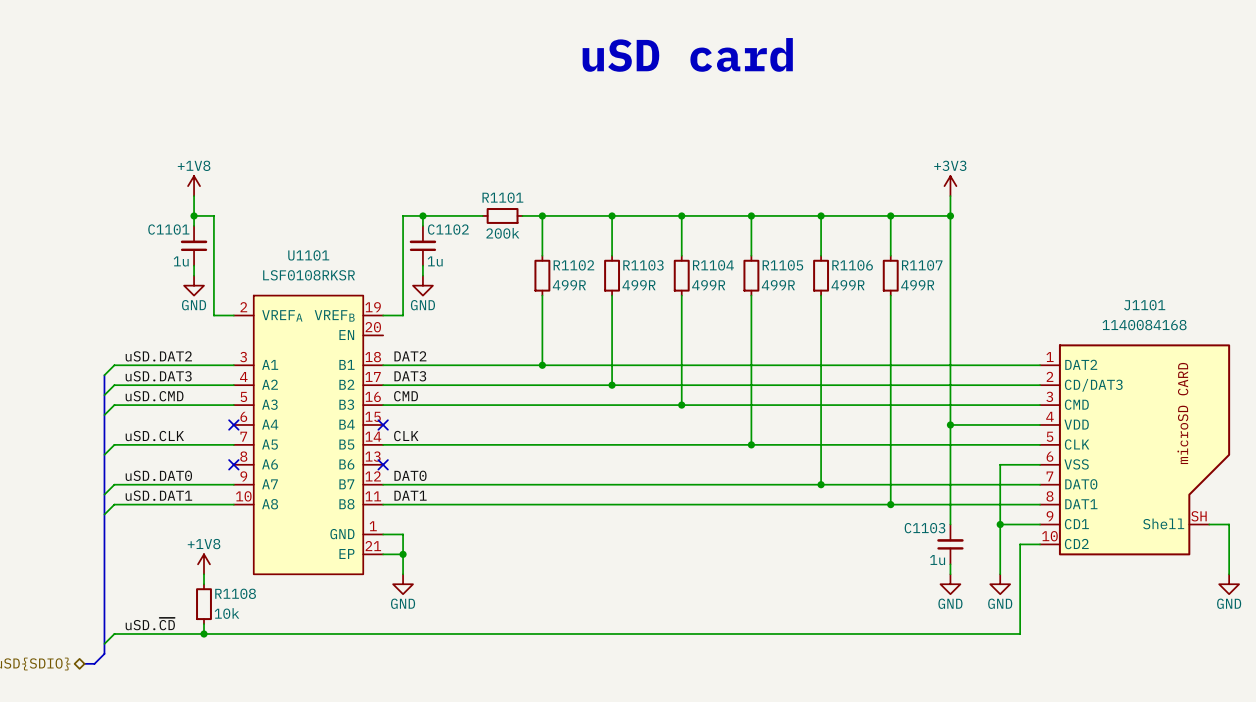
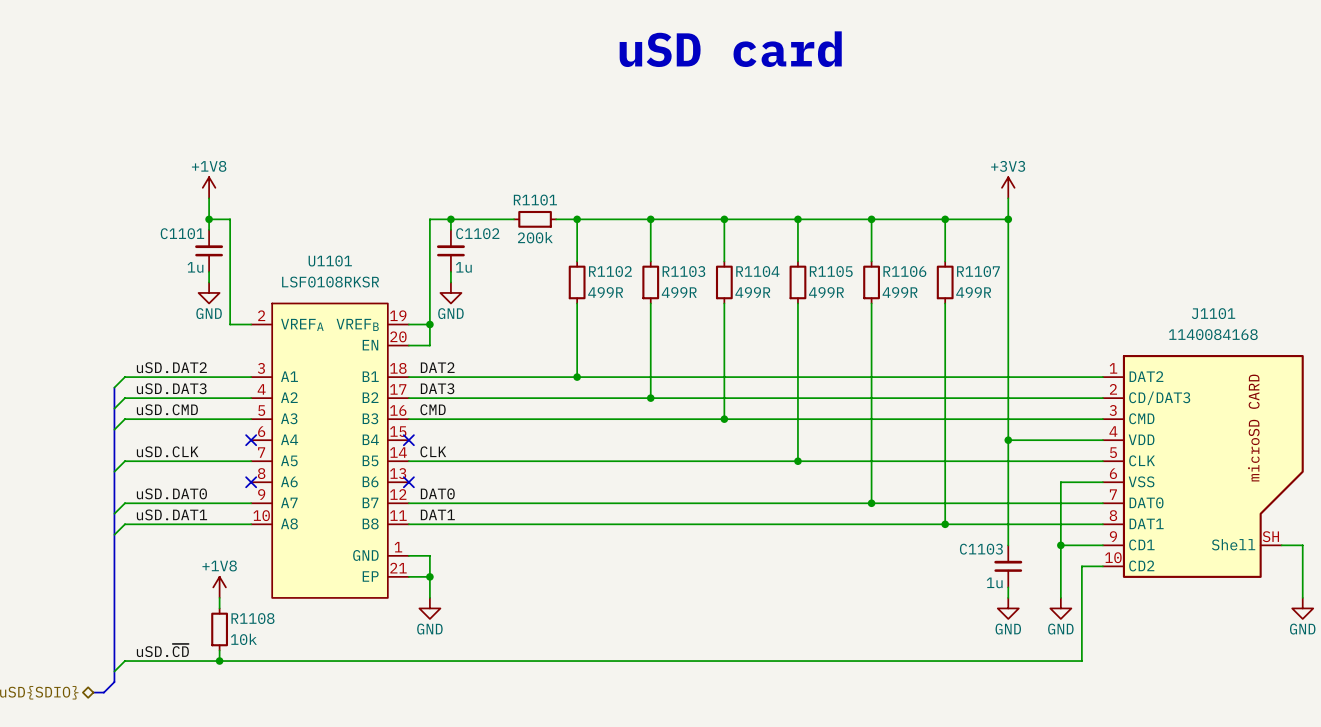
wire: none -> (429, 324) (429, 345) (408, 345)
junction: none -> (429, 324)

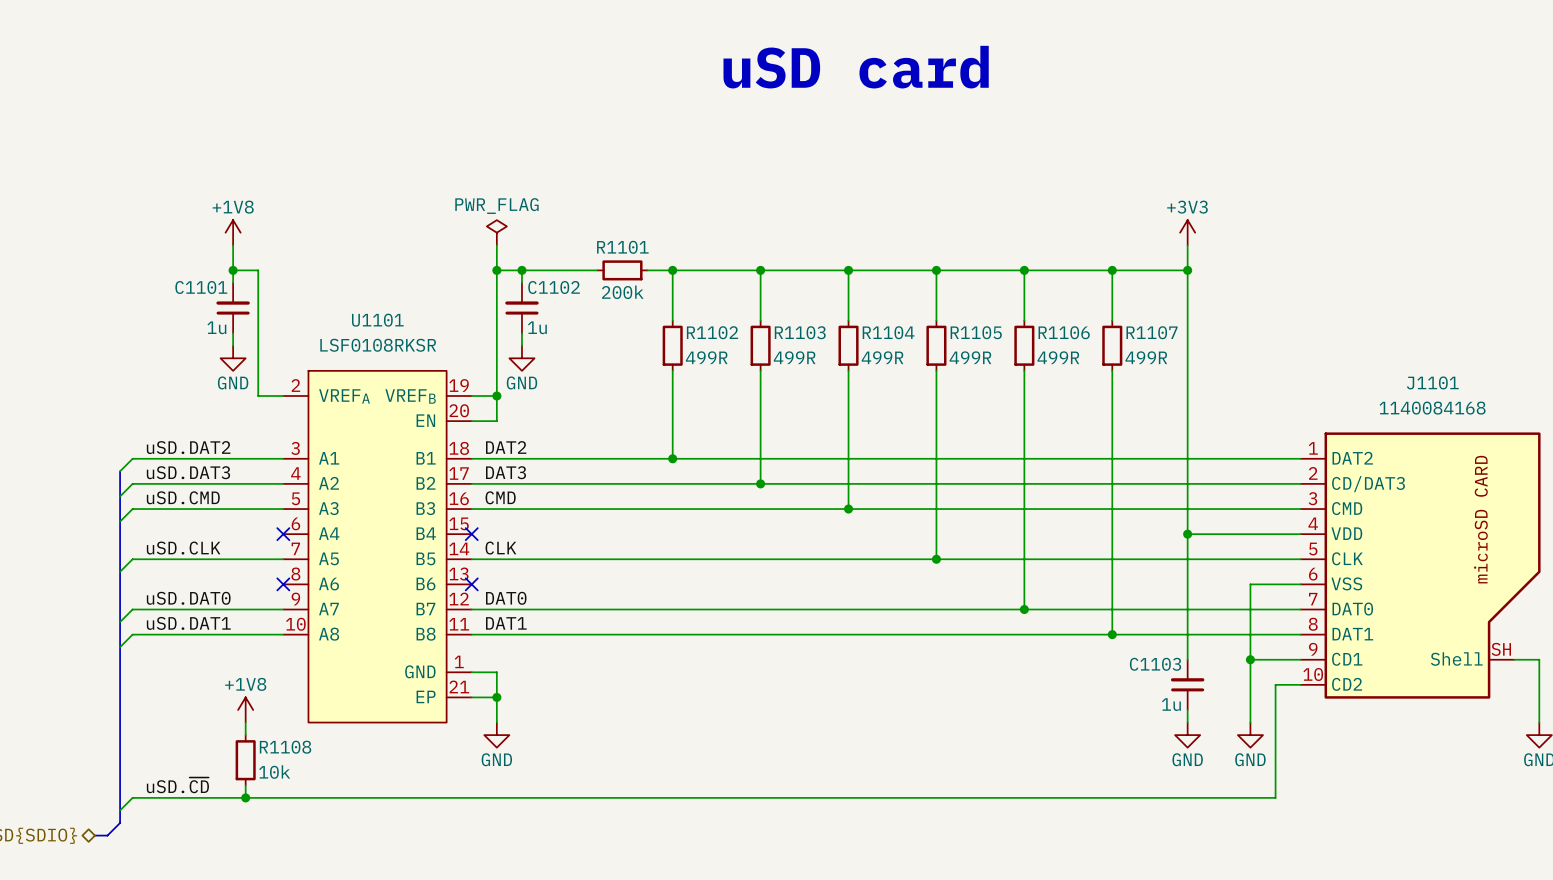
power symbol: none -> PWR_FLAG (496, 232)
wire: none -> (496, 245) (496, 270)
junction: none -> (496, 270)

